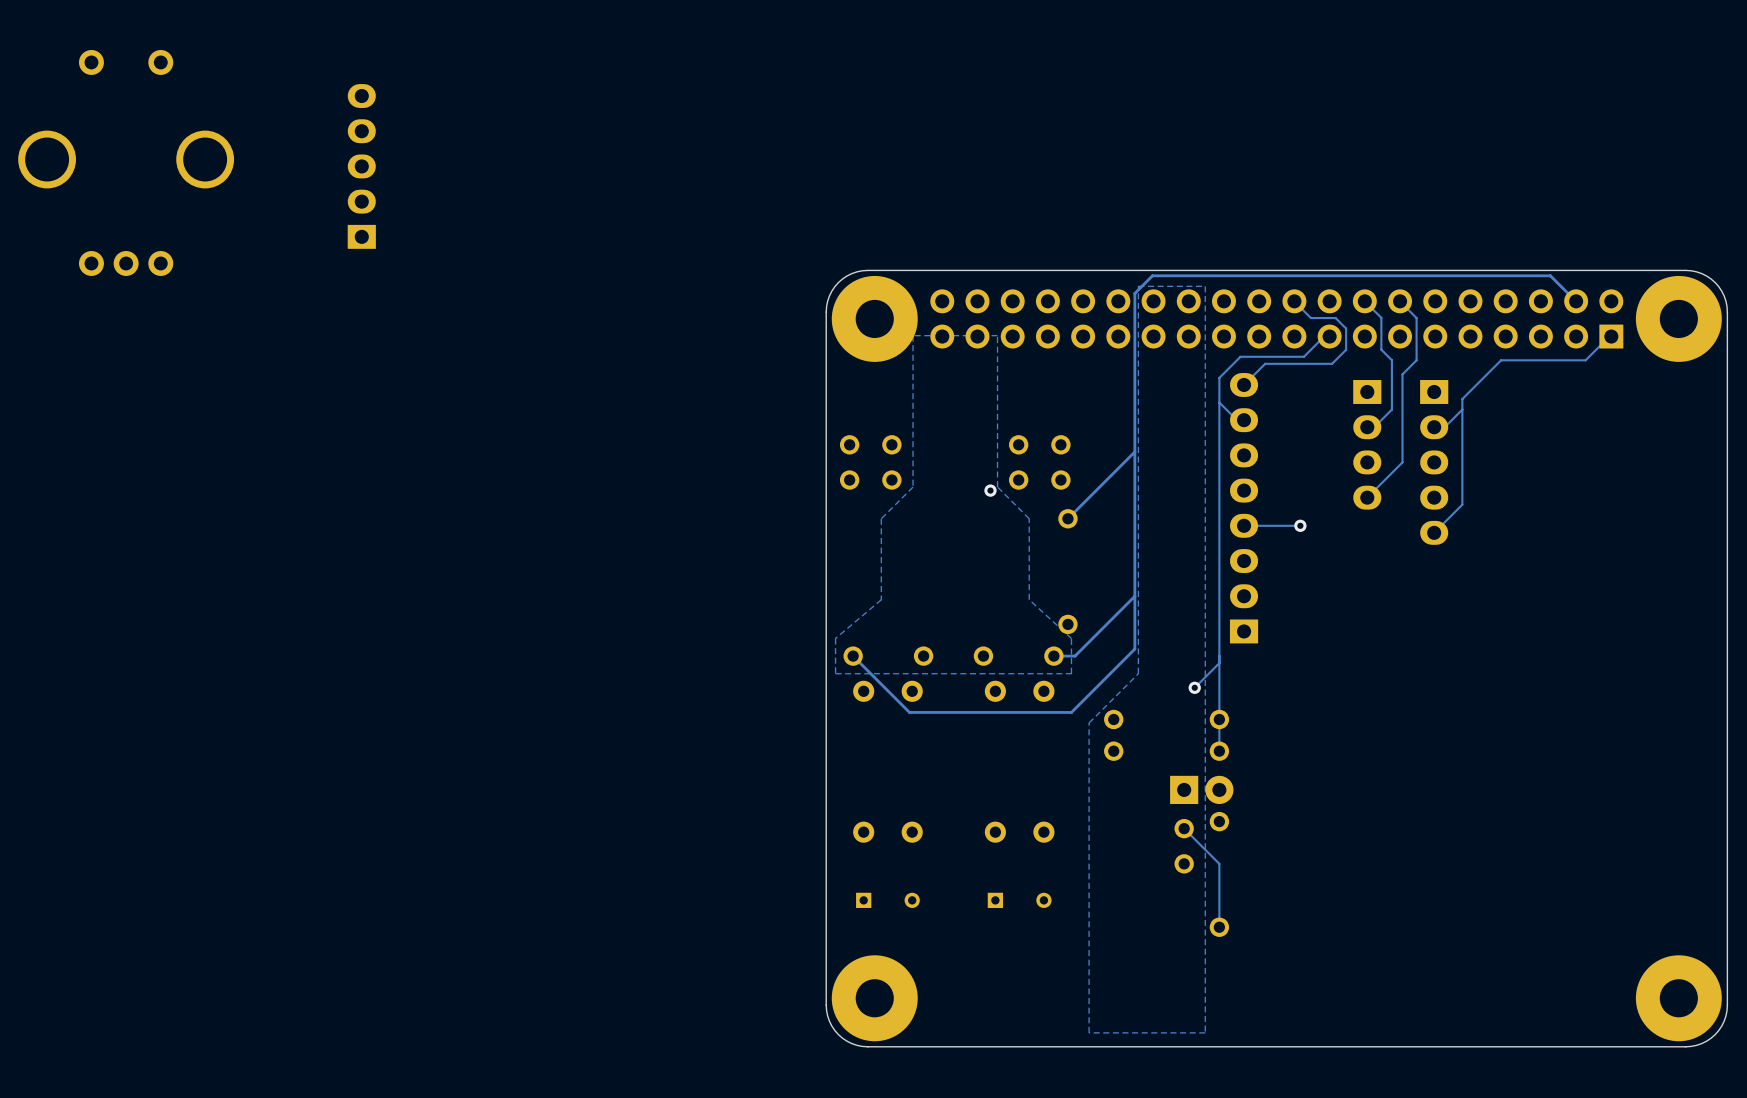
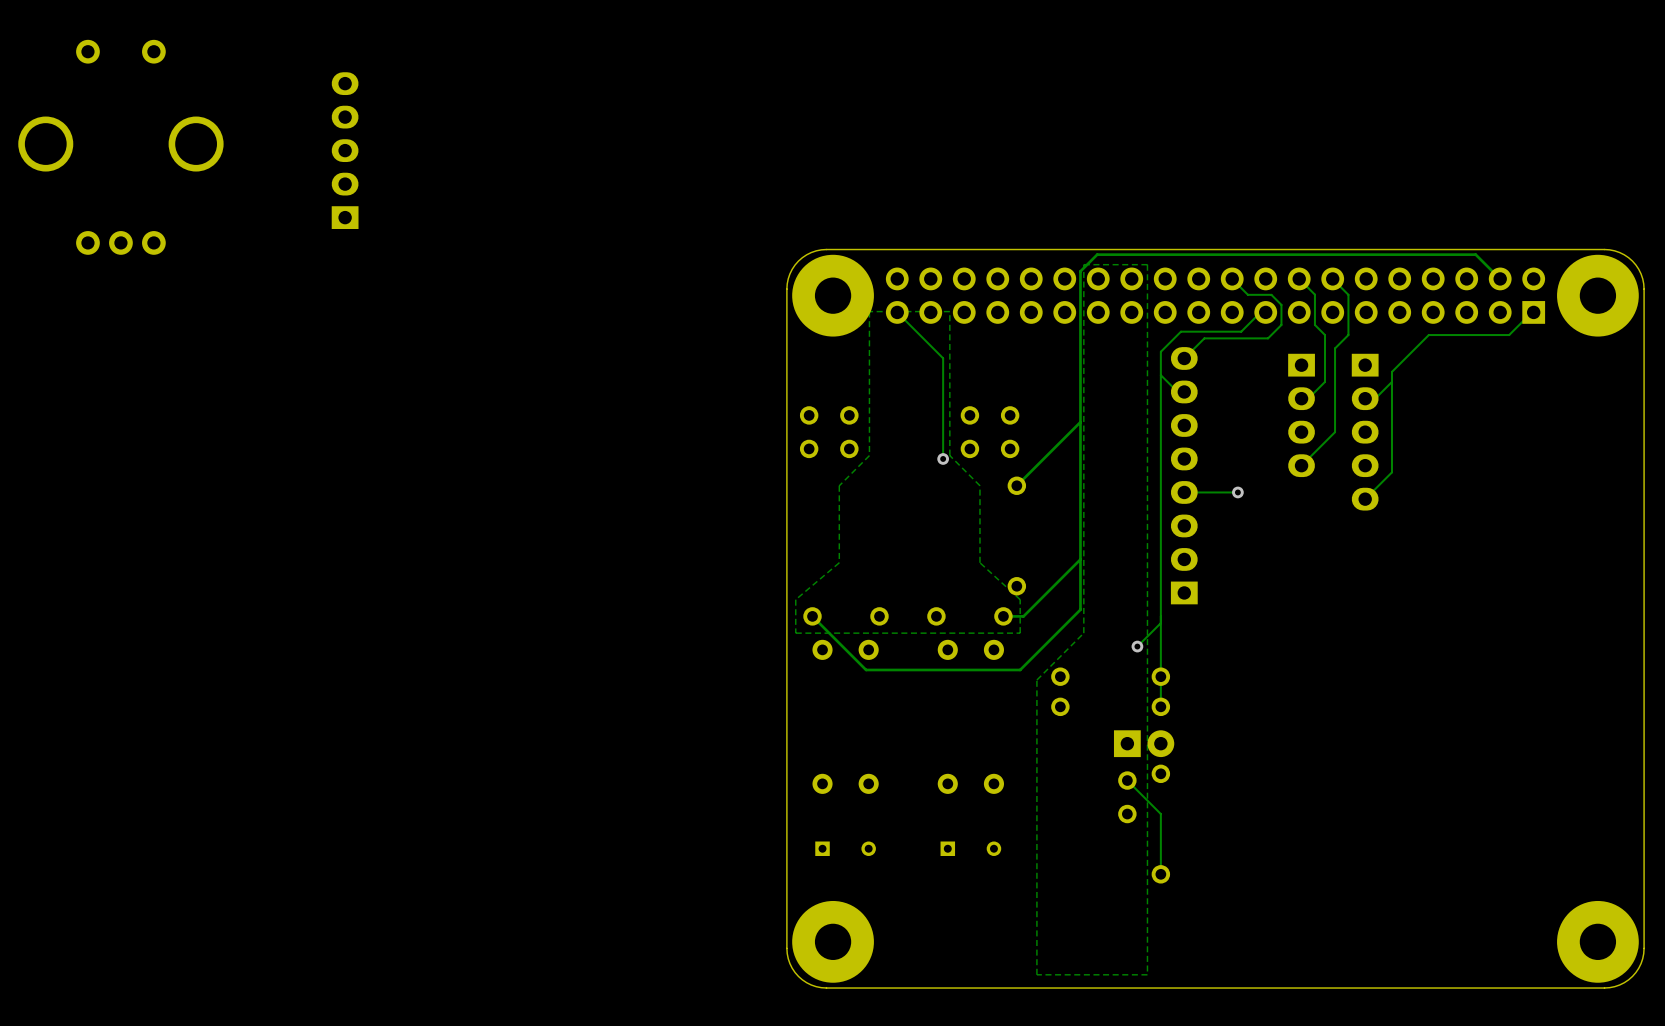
track: none -> (897, 312) (943, 358) (943, 458)

